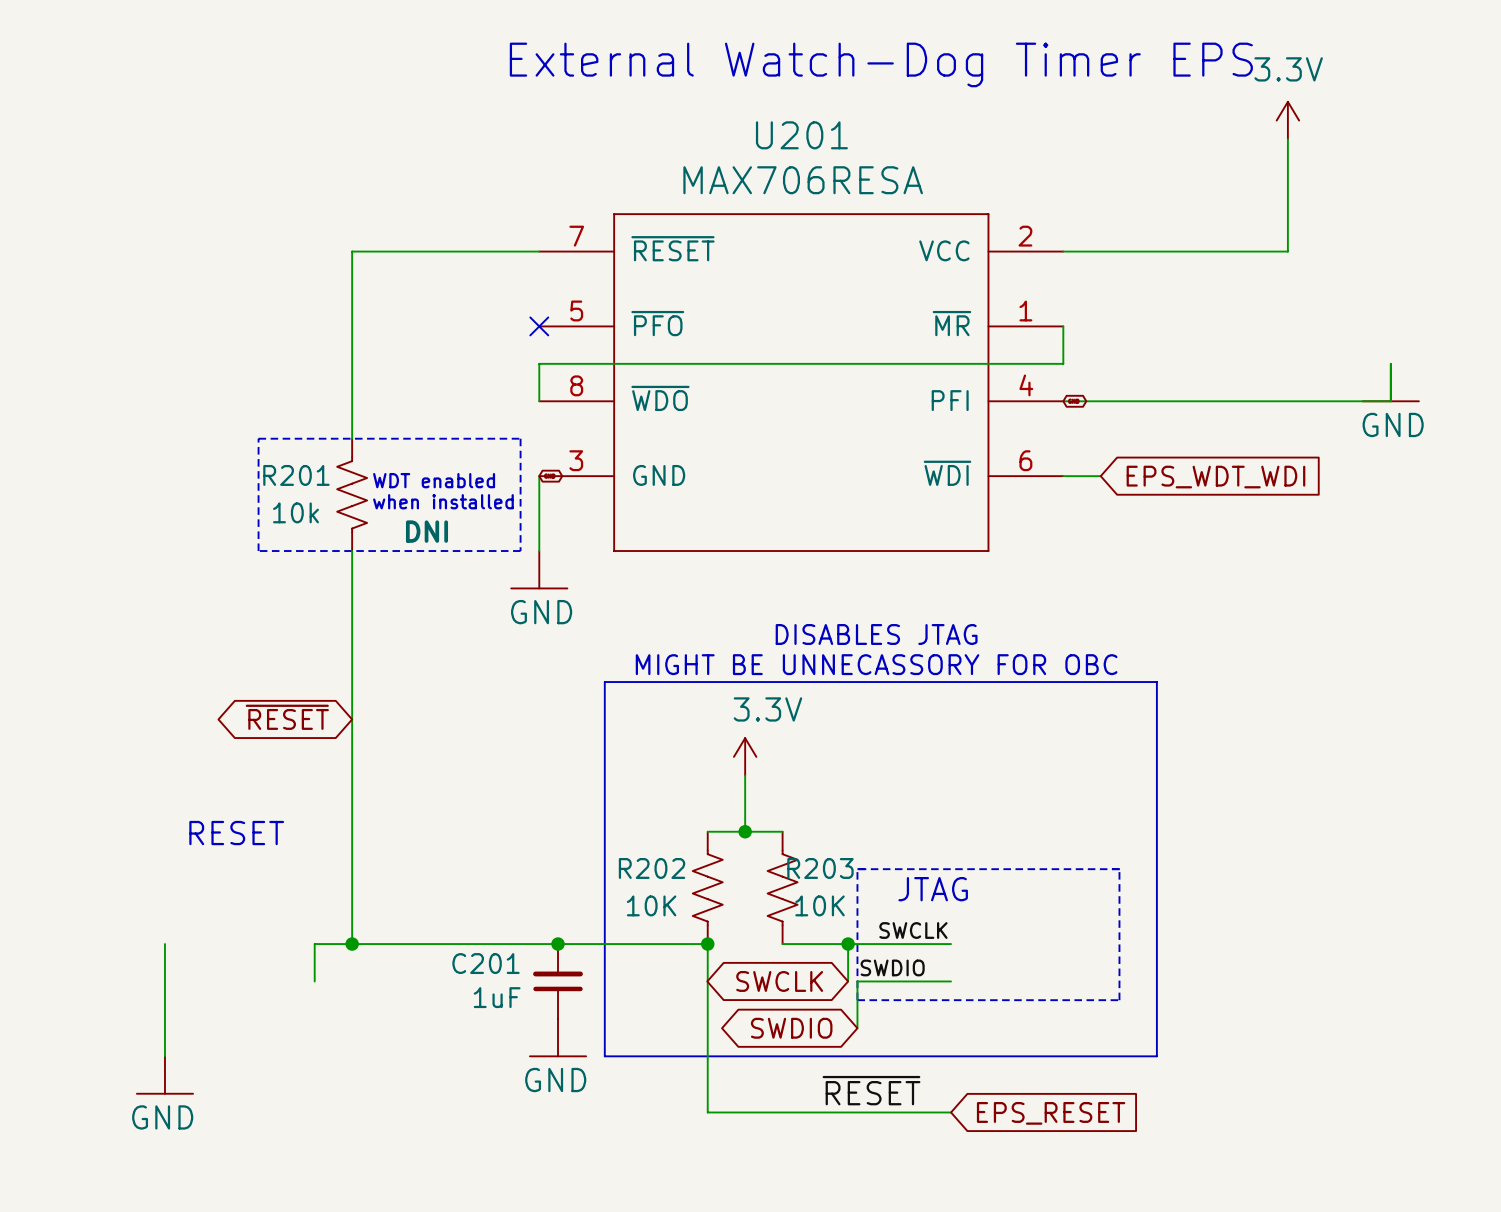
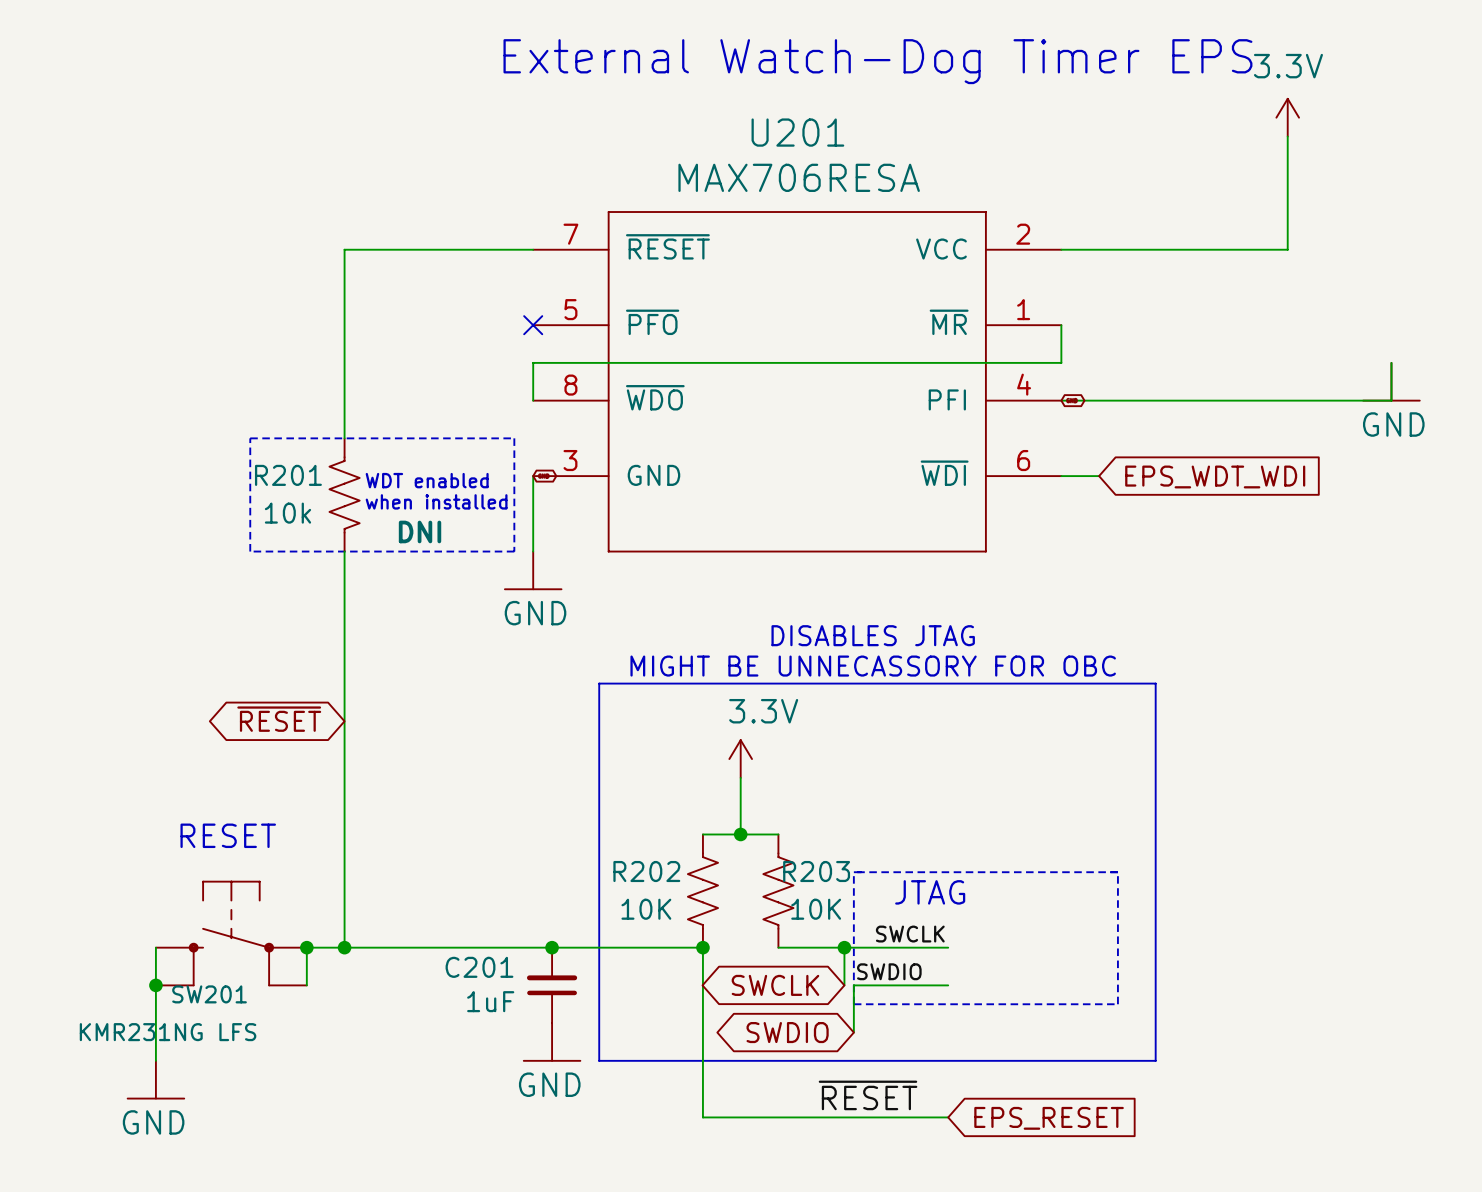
SW201: none -> KMR231NG LFS (231, 933)
junction: none -> (306, 947)
junction: none -> (155, 985)

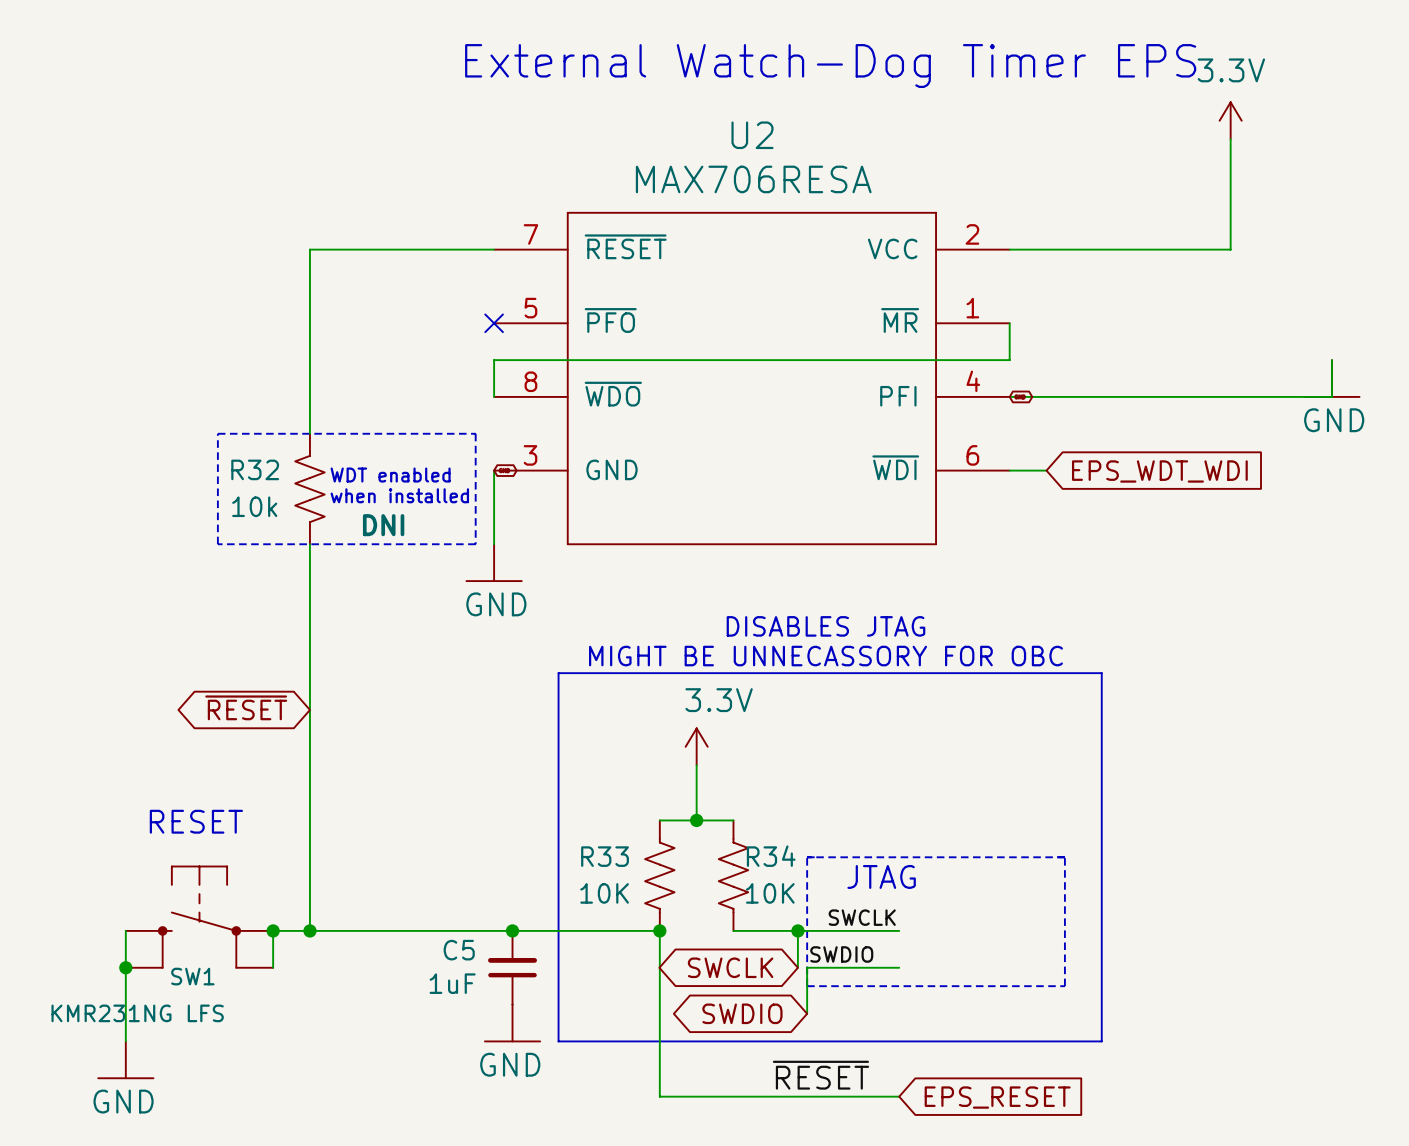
U201 name: U201 (797, 132) -> U2 (752, 135)
R201 name: R201 (288, 475) -> R32 (255, 469)
R202 name: R202 (646, 871) -> R33 (605, 856)
R203 name: R203 (816, 871) -> R34 (771, 856)
C201 name: C201 (479, 967) -> C5 (459, 950)
SW201 name: SW201 (209, 994) -> SW1 (192, 976)

